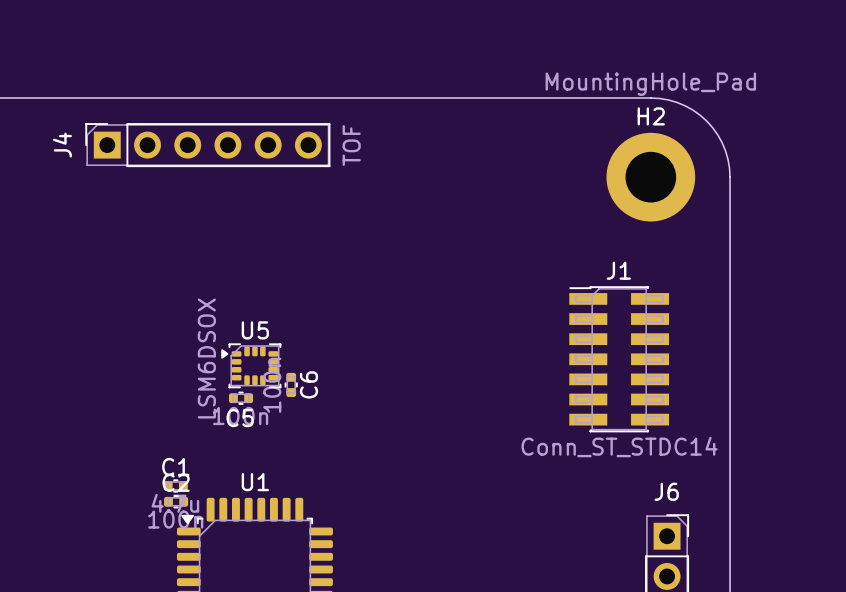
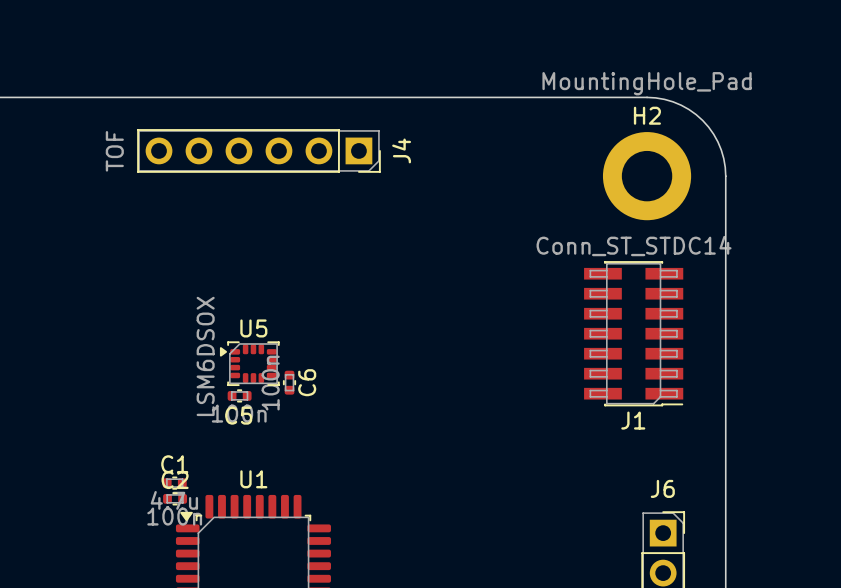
J4 rotation: 0° (207, 145) -> 180° (258, 150)
J1 rotation: 0° (619, 359) -> 180° (633, 333)

